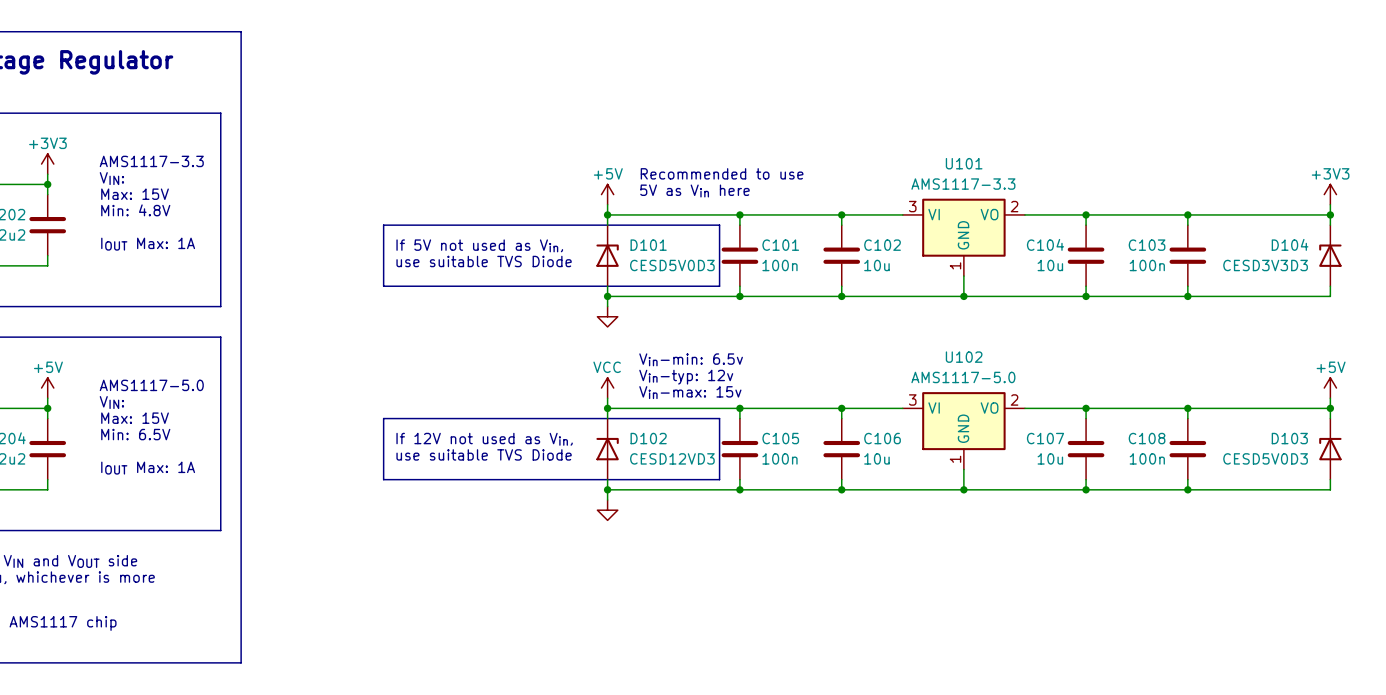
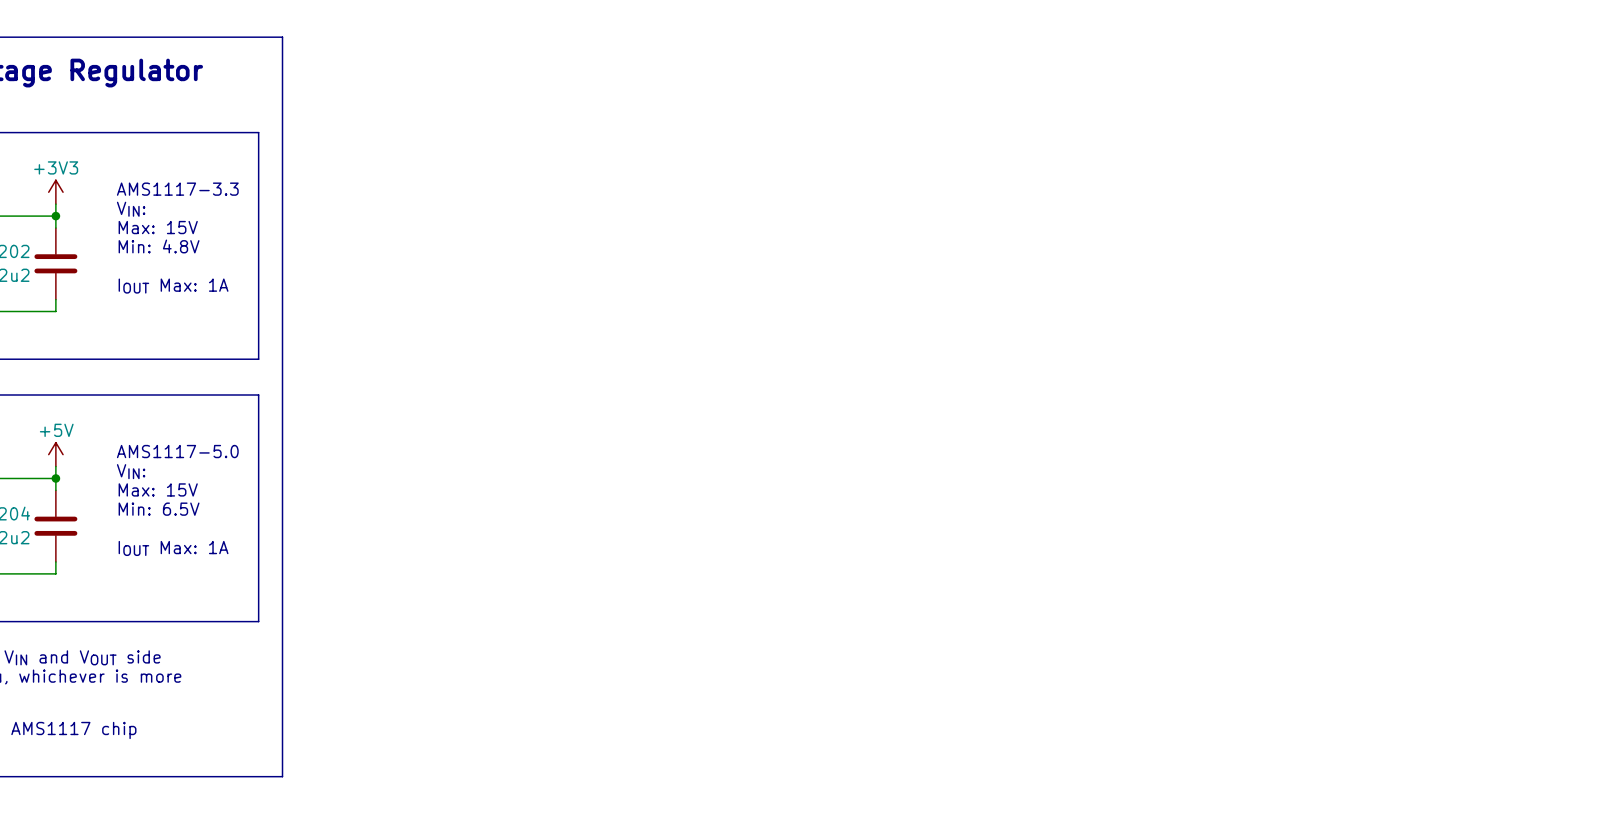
text: Recommended to use (722, 173) -> none
text: 5V as Vin here (694, 191) -> none
power symbol: +5V (607, 194) -> none
power symbol: +3V3 (1330, 194) -> none
wire: (607, 204) (607, 225) -> none
wire: (1330, 204) (1330, 225) -> none
wire: (607, 214) (902, 214) -> none
junction: (607, 214) -> none
wire: (739, 214) (739, 225) -> none
junction: (739, 214) -> none
wire: (841, 214) (841, 225) -> none
junction: (841, 214) -> none
wire: (1024, 214) (1330, 214) -> none
wire: (1086, 214) (1086, 225) -> none
junction: (1086, 214) -> none
wire: (1187, 214) (1187, 225) -> none
junction: (1187, 214) -> none
junction: (1330, 214) -> none
line: (383, 225) (719, 225) (719, 286) (383, 286) (383, 225) -> none
U101: AMS1117-3.3 (963, 237) -> none
text: If 5V not used as Vin, (479, 245) -> none
D101: CESD5V0D3 (607, 255) -> none
C101: 100n (739, 255) -> none
C102: 10u (841, 255) -> none
C104: 10u (1086, 255) -> none
C103: 100n (1187, 255) -> none
D104: CESD3V3D3 (1330, 255) -> none
text: use suitable TVS Diode (484, 261) -> none
wire: (963, 276) (963, 296) -> none
wire: (607, 286) (607, 306) -> none
wire: (739, 286) (739, 296) -> none
wire: (841, 286) (841, 296) -> none
wire: (1086, 286) (1086, 296) -> none
wire: (1187, 286) (1187, 296) -> none
wire: (1330, 286) (1330, 296) (607, 296) -> none
junction: (607, 296) -> none
junction: (739, 296) -> none
junction: (841, 296) -> none
junction: (963, 296) -> none
junction: (1086, 296) -> none
junction: (1187, 296) -> none
power symbol: (607, 316) -> none
text: Vin-min: 6.5v (691, 359) -> none
text: Vin-typ: 12v (686, 377) -> none
power symbol: VCC (607, 388) -> none
power symbol: +5V (1330, 388) -> none
text: Vin-max: 15v (690, 392) -> none
wire: (607, 398) (607, 418) -> none
wire: (1330, 398) (1330, 418) -> none
wire: (607, 408) (902, 408) -> none
junction: (607, 408) -> none
wire: (739, 408) (739, 418) -> none
junction: (739, 408) -> none
wire: (841, 408) (841, 418) -> none
junction: (841, 408) -> none
wire: (1024, 408) (1330, 408) -> none
wire: (1086, 408) (1086, 418) -> none
junction: (1086, 408) -> none
wire: (1187, 408) (1187, 418) -> none
junction: (1187, 408) -> none
junction: (1330, 408) -> none
line: (383, 418) (383, 479) (719, 479) (719, 418) (383, 418) -> none
U102: AMS1117-5.0 (963, 430) -> none
text: If 12V not used as Vin, (484, 439) -> none
D102: CESD12VD3 (607, 449) -> none
C105: 100n (739, 449) -> none
C106: 10u (841, 449) -> none
C107: 10u (1086, 449) -> none
C108: 100n (1187, 449) -> none
D103: CESD5V0D3 (1330, 449) -> none
text: use suitable TVS Diode (484, 454) -> none
wire: (963, 469) (963, 489) -> none
wire: (607, 479) (607, 500) -> none
wire: (739, 479) (739, 489) -> none
wire: (841, 479) (841, 489) -> none
wire: (1086, 479) (1086, 489) -> none
wire: (1187, 479) (1187, 489) -> none
wire: (1330, 479) (1330, 489) (607, 489) -> none
junction: (607, 489) -> none
junction: (739, 489) -> none
junction: (841, 489) -> none
junction: (963, 489) -> none
junction: (1086, 489) -> none
junction: (1187, 489) -> none
power symbol: (607, 510) -> none

